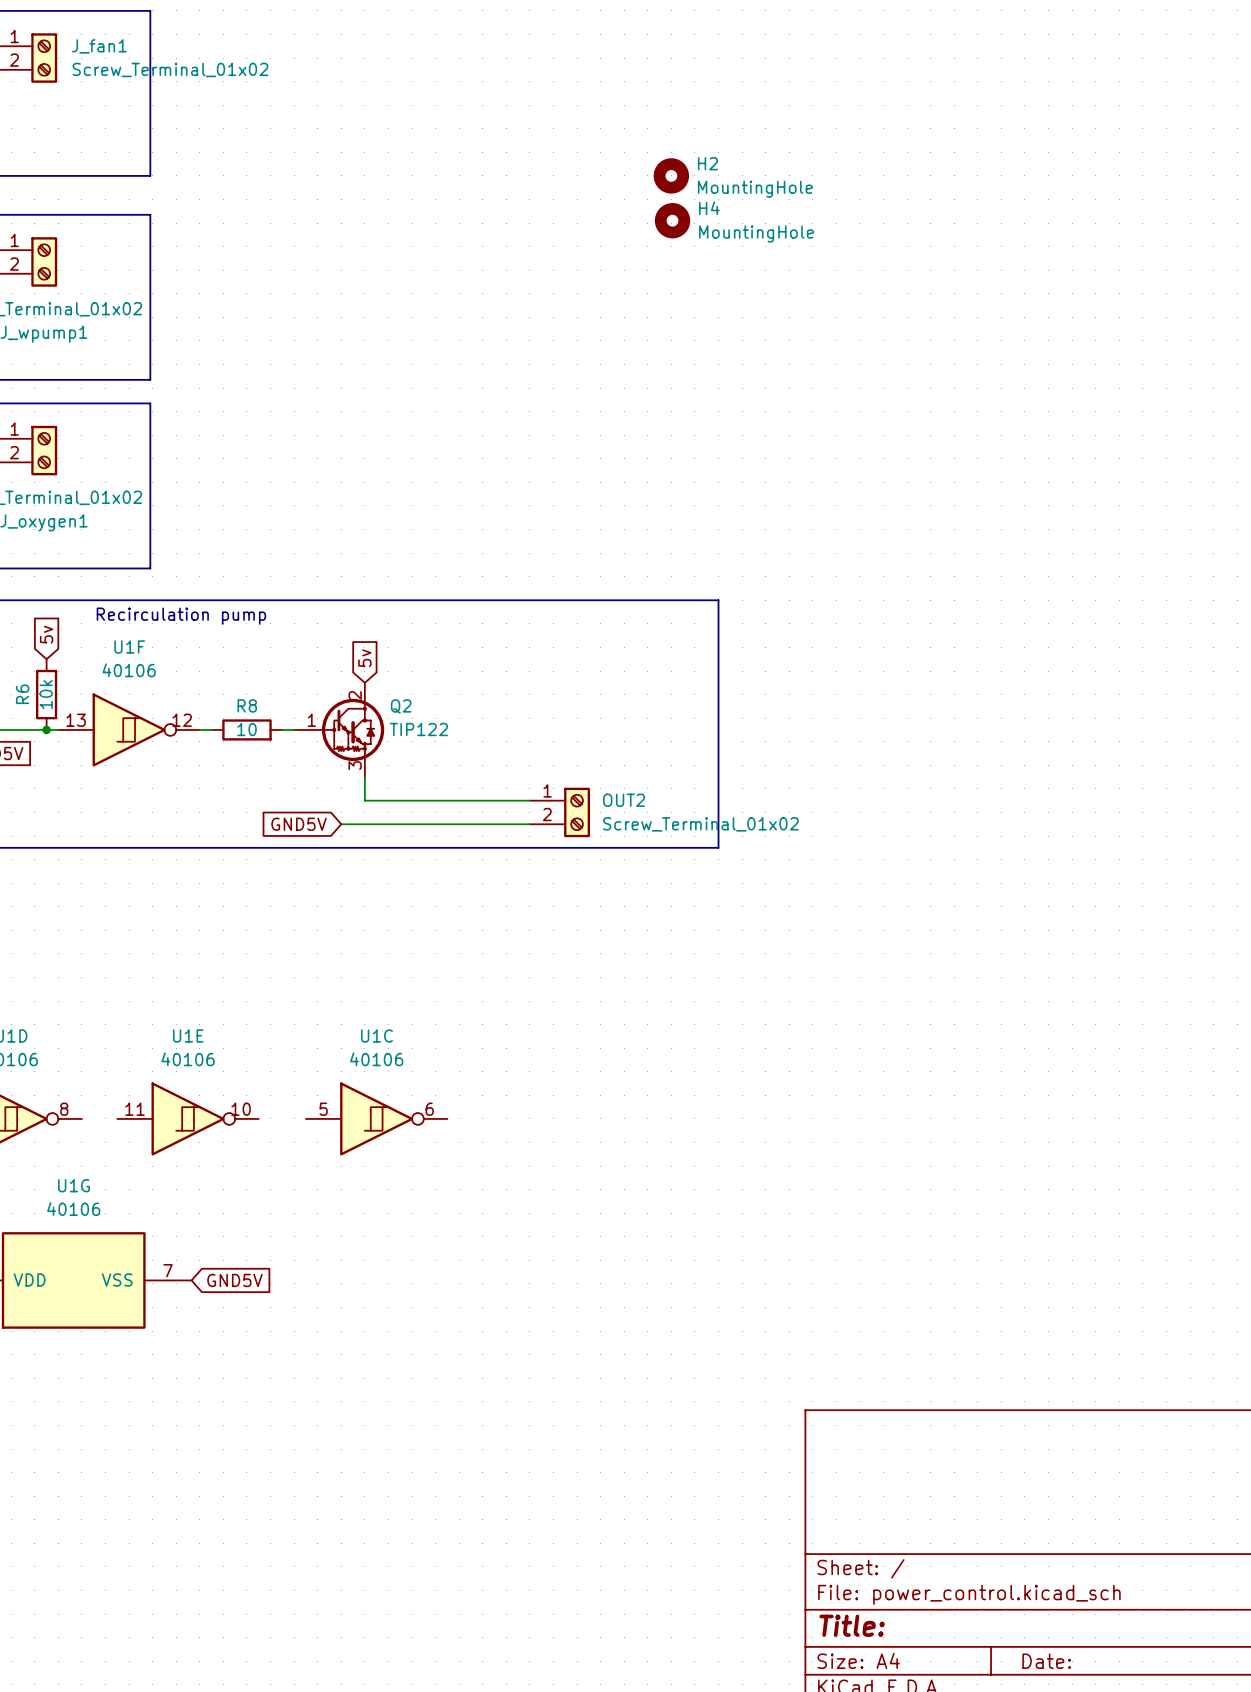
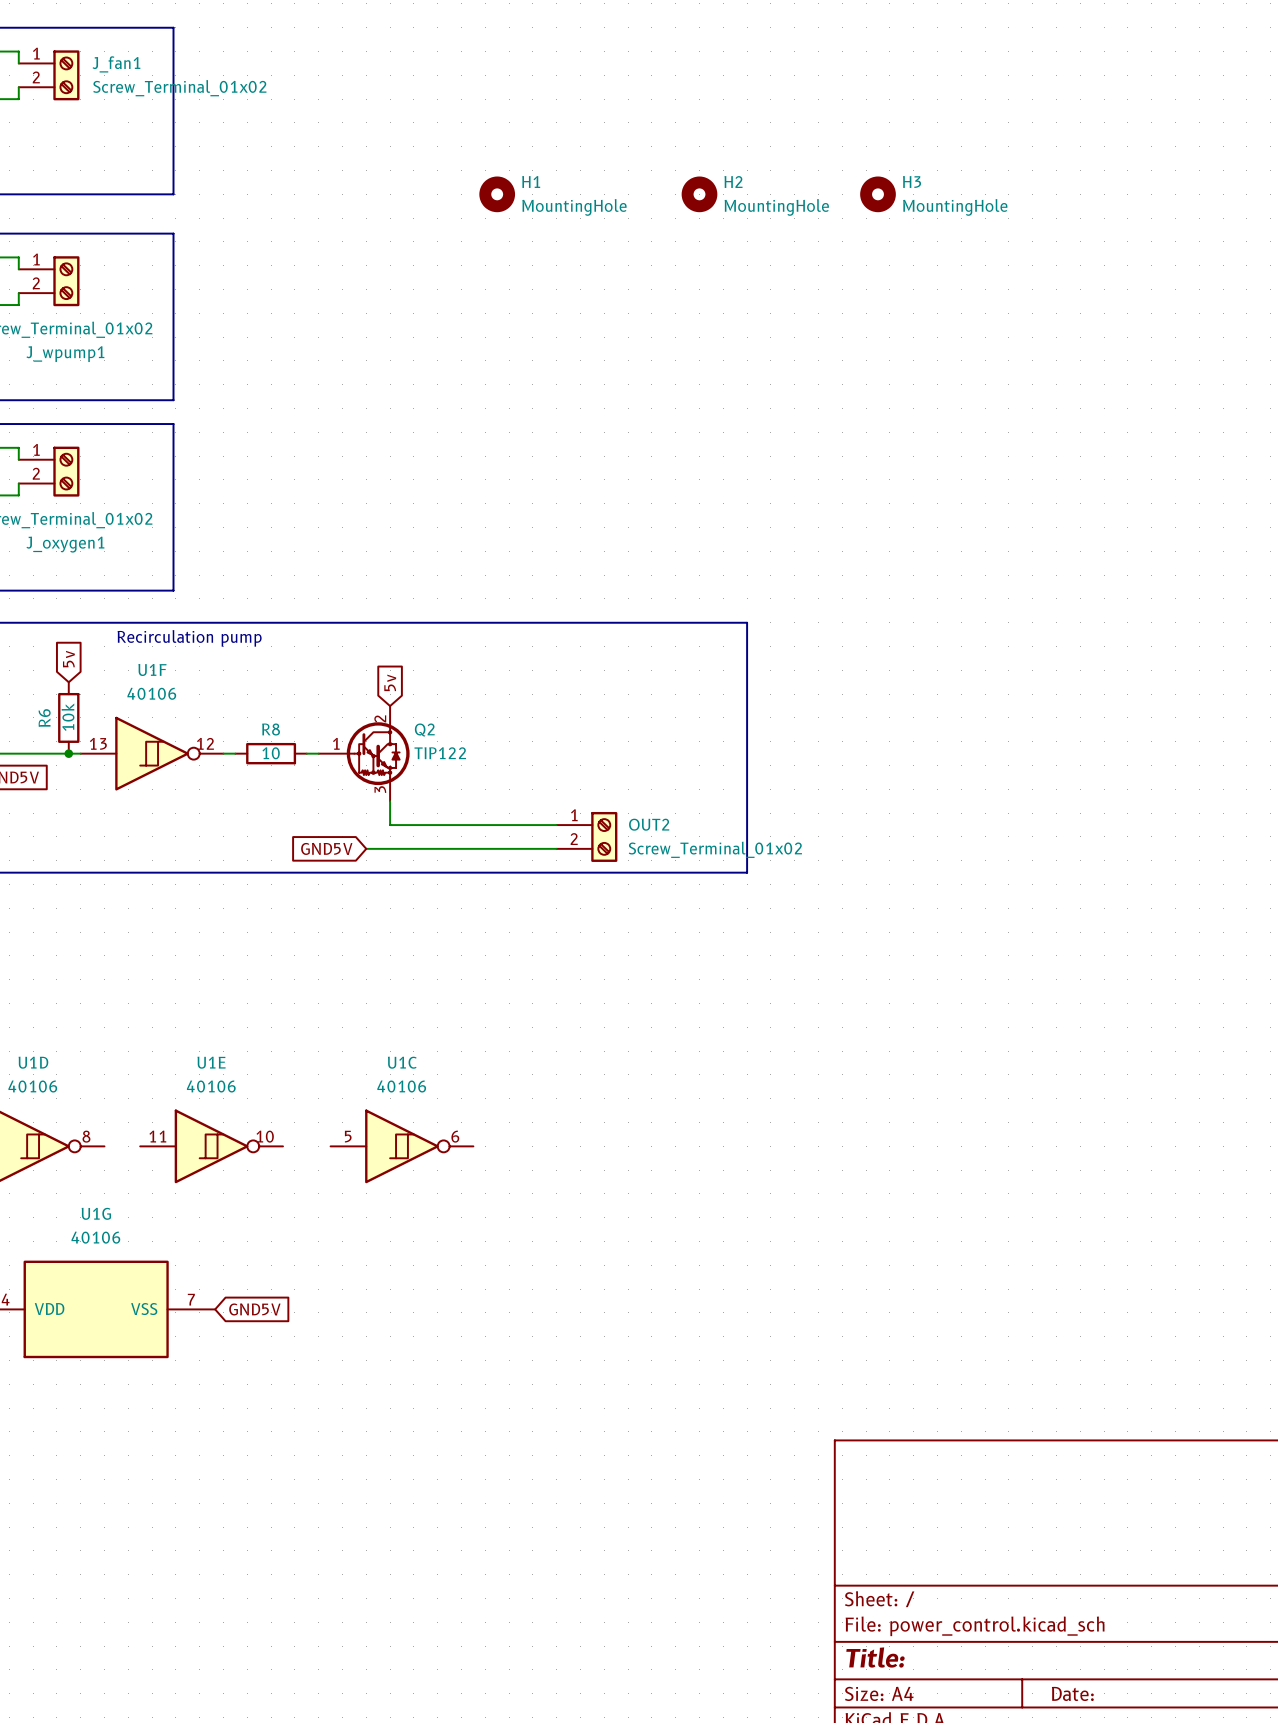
H1: none -> MountingHole (497, 194)
H3: none -> MountingHole (878, 194)
H4: MountingHole (672, 220) -> none

